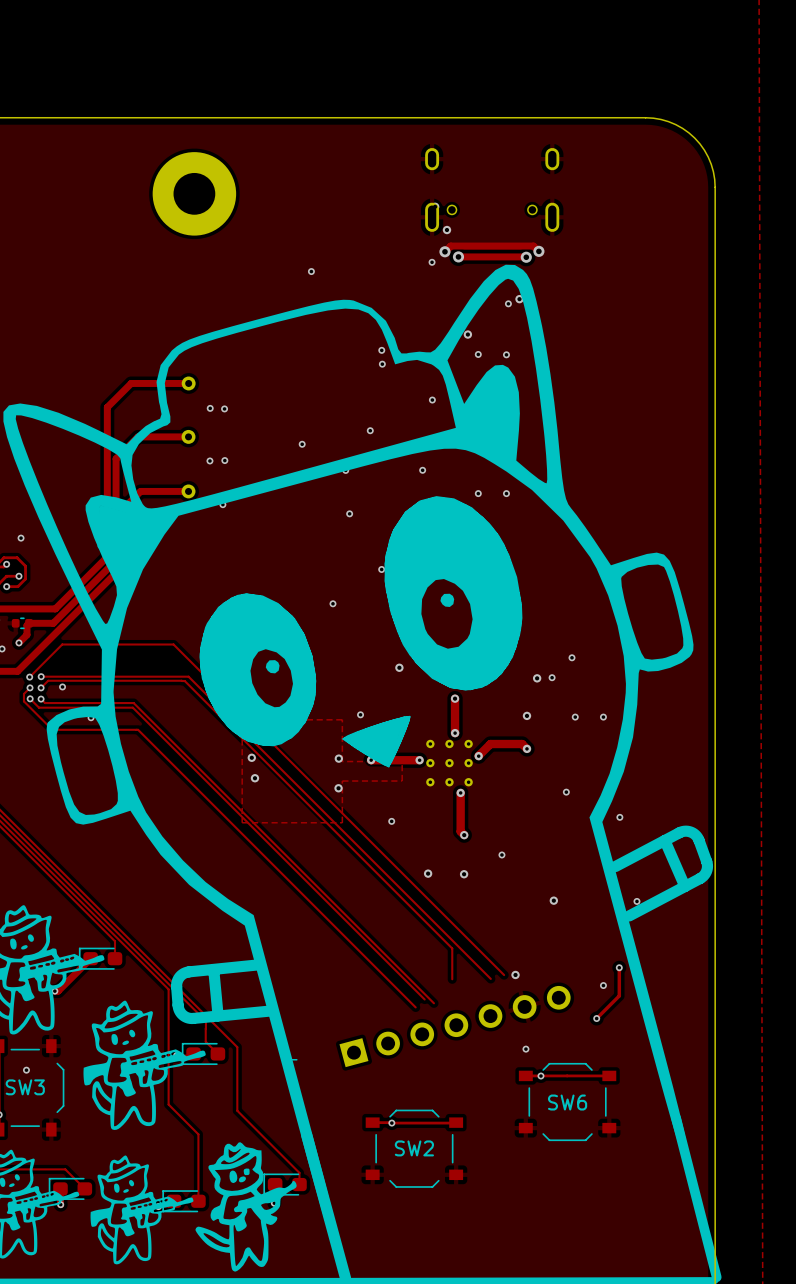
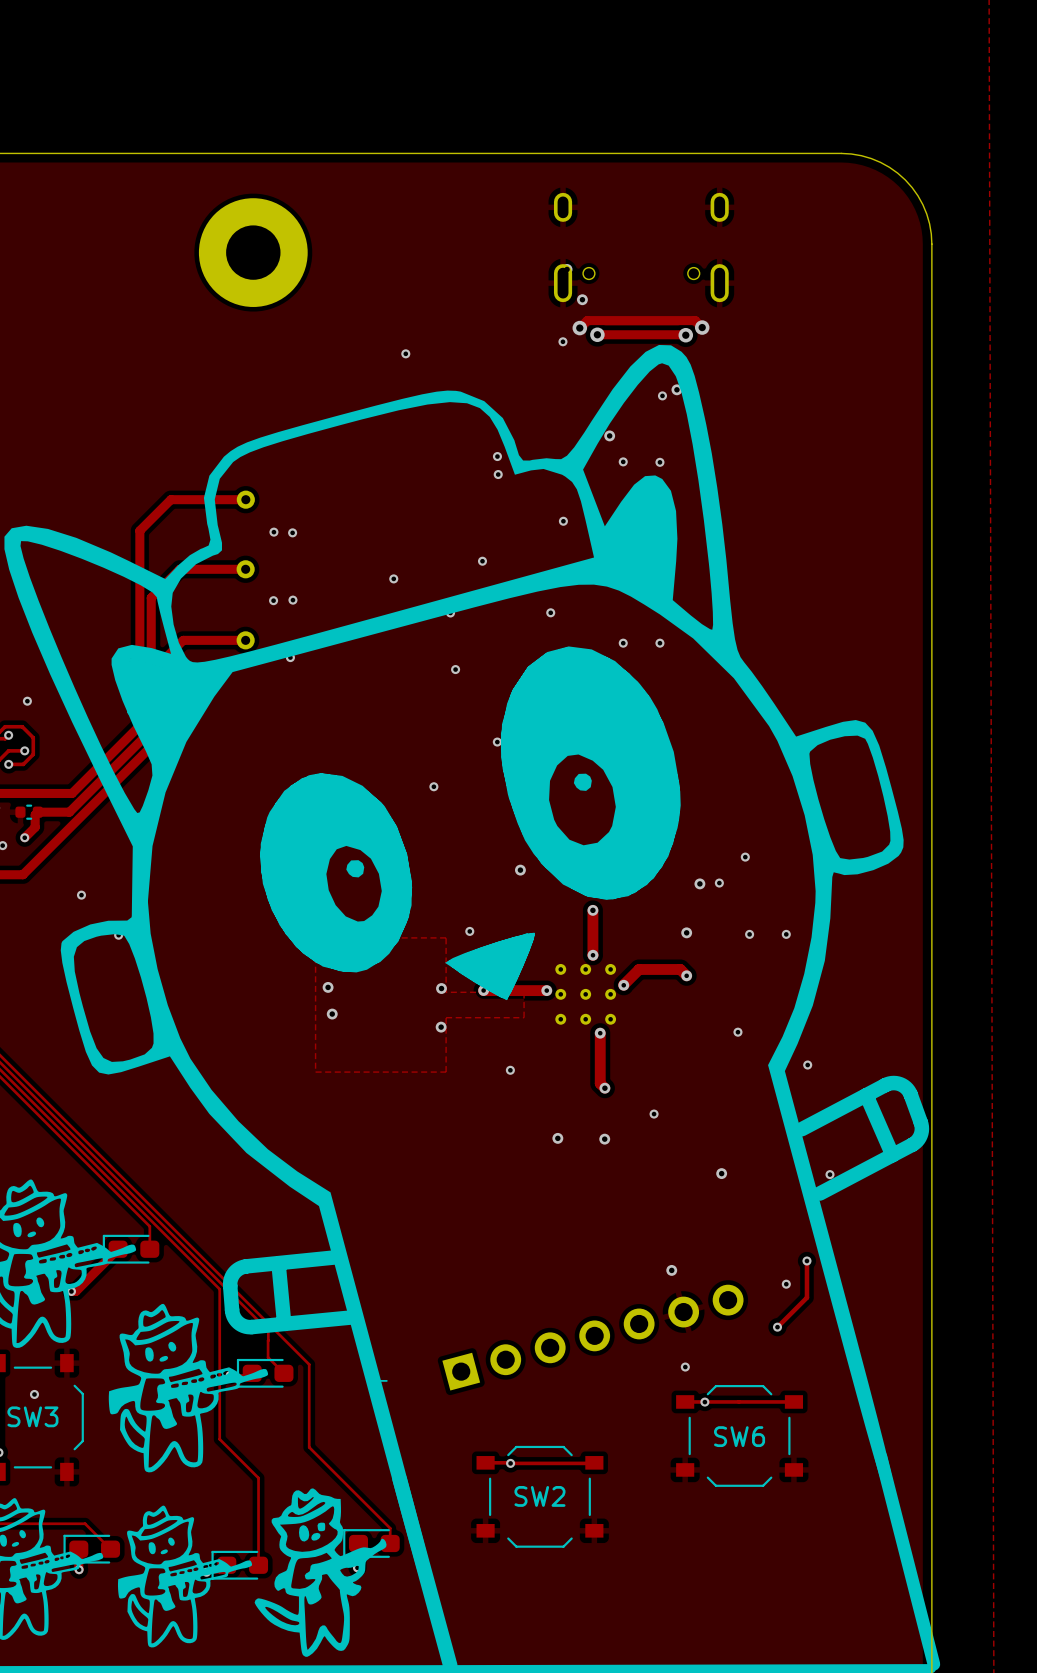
track: (41, 676) (188, 676) (490, 978) -> none
via: (41, 676) -> none
track: (29, 677) (62, 644) (173, 644) (504, 975) -> none
via: (29, 677) -> none
track: (30, 687) (23, 693) (23, 701) (52, 729) (138, 729) (415, 1007) -> none
via: (30, 687) -> none
track: (41, 687) (48, 680) (184, 681) (452, 948) (452, 979) -> none
via: (41, 687) -> none
track: (30, 698) (39, 707) (132, 707) (424, 999) -> none
via: (30, 698) -> none
track: (41, 699) (45, 703) (133, 703) (433, 1003) -> none
via: (41, 699) -> none

